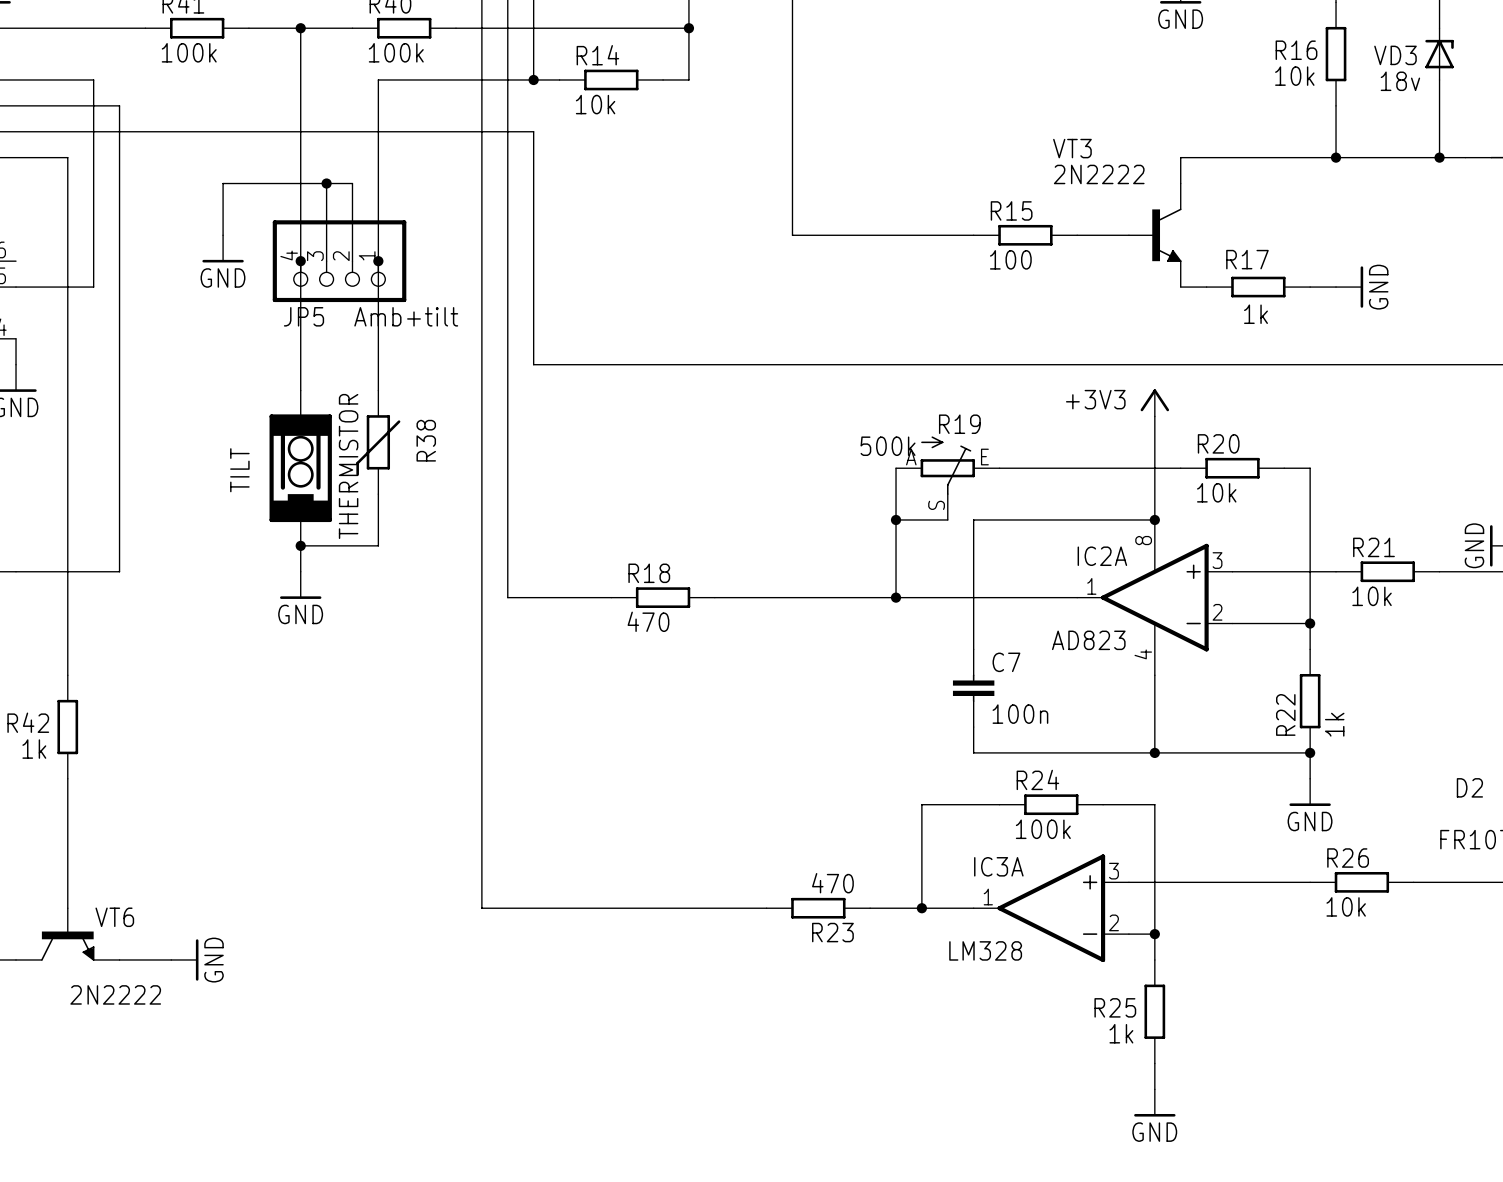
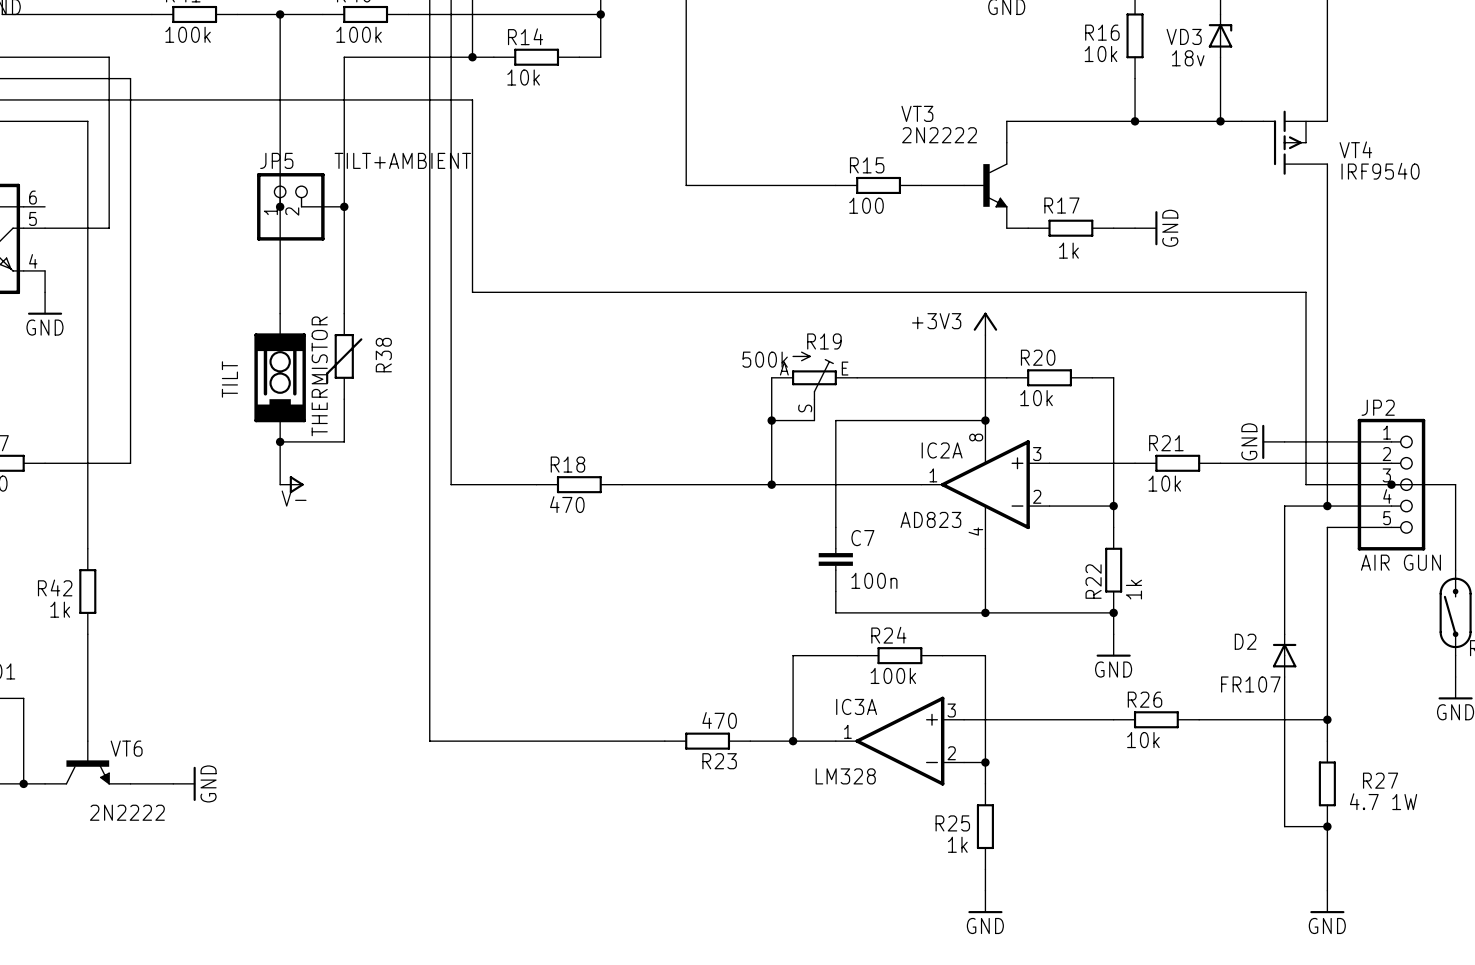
wire: (326, 183) (326, 261) -> (344, 206) (301, 206)
junction: (326, 183) -> none
JP5 symbol: [272, 220, 407, 303] -> [257, 173, 325, 241]
wire: (223, 235) (223, 183) (352, 183) (352, 261) -> none
power symbol: GND (223, 248) -> none
JP5 name position: JP5 (304, 316) -> JP5 (276, 160)
JP5 value: Amb+tilt (406, 316) -> TILT+AMBIENT (402, 160)
power symbol: GND (300, 585) -> none
power symbol: none -> V- (291, 484)

